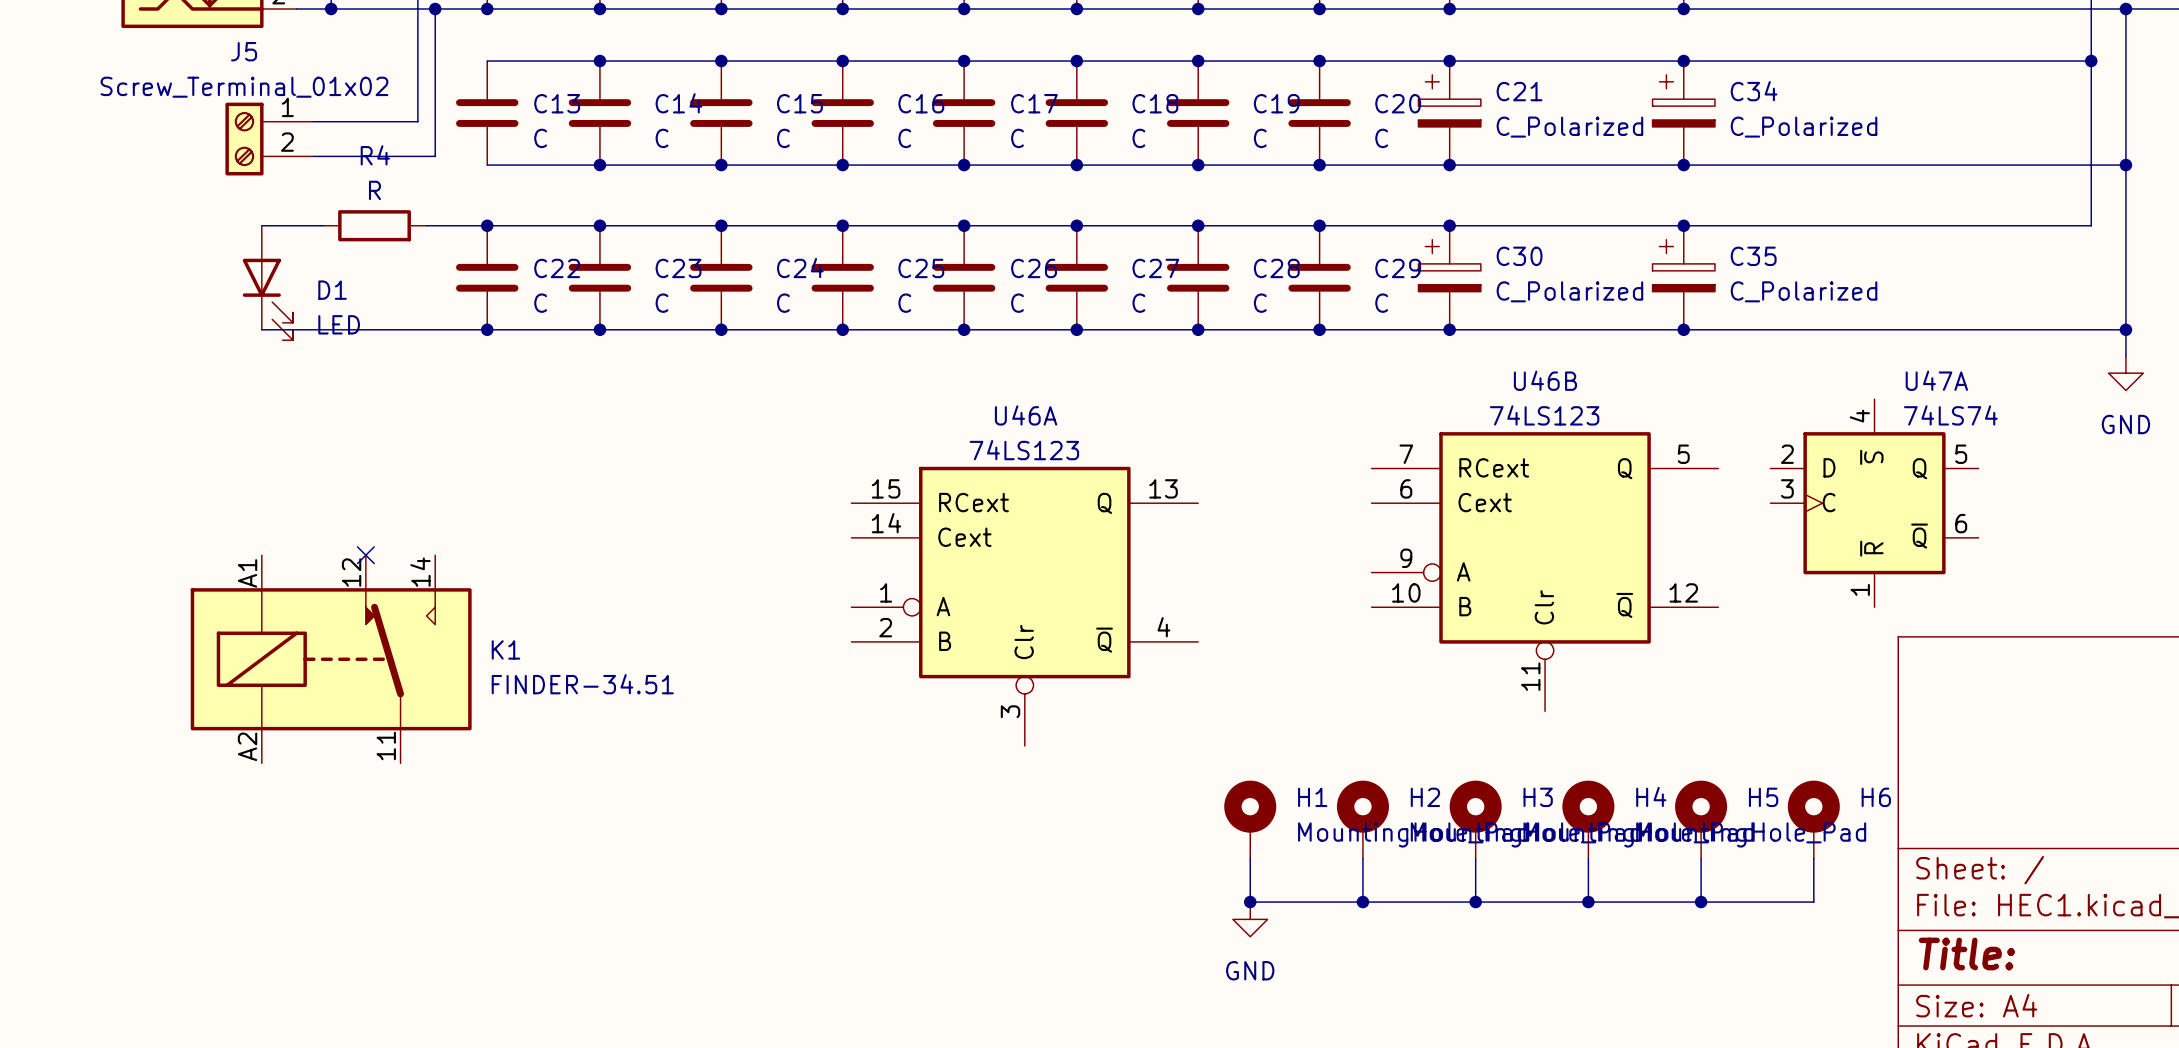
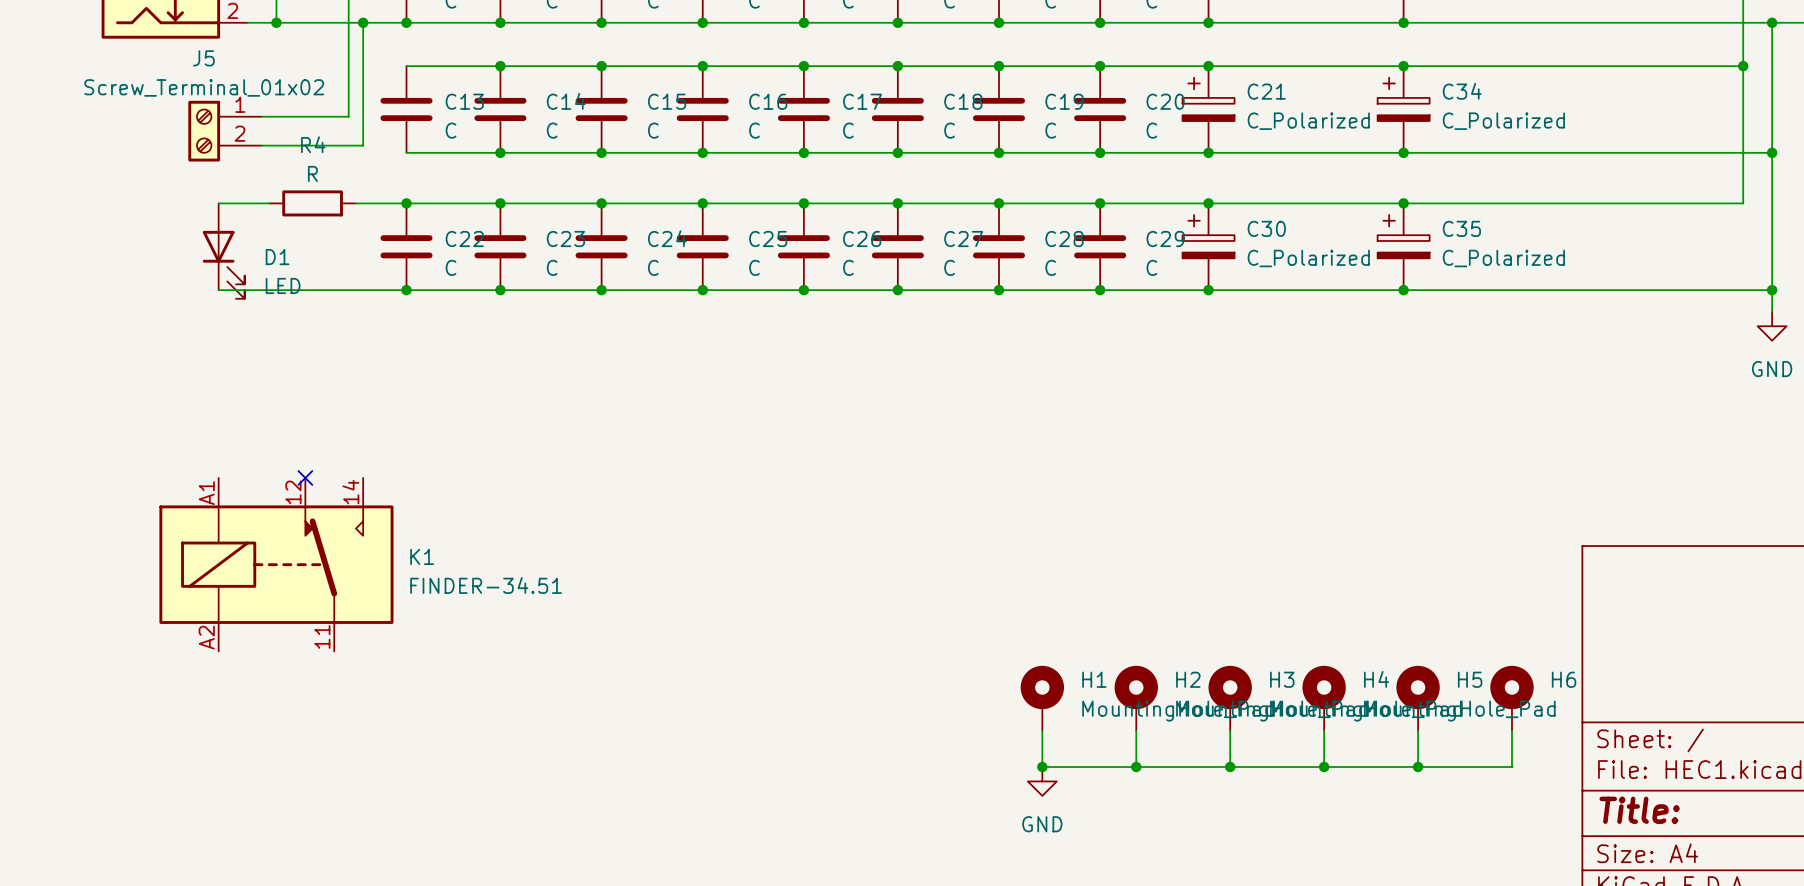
U47A: 74LS74 (1874, 503) -> none
U46B: 74LS123 (1545, 571) -> none
U46A: 74LS123 (1024, 606) -> none

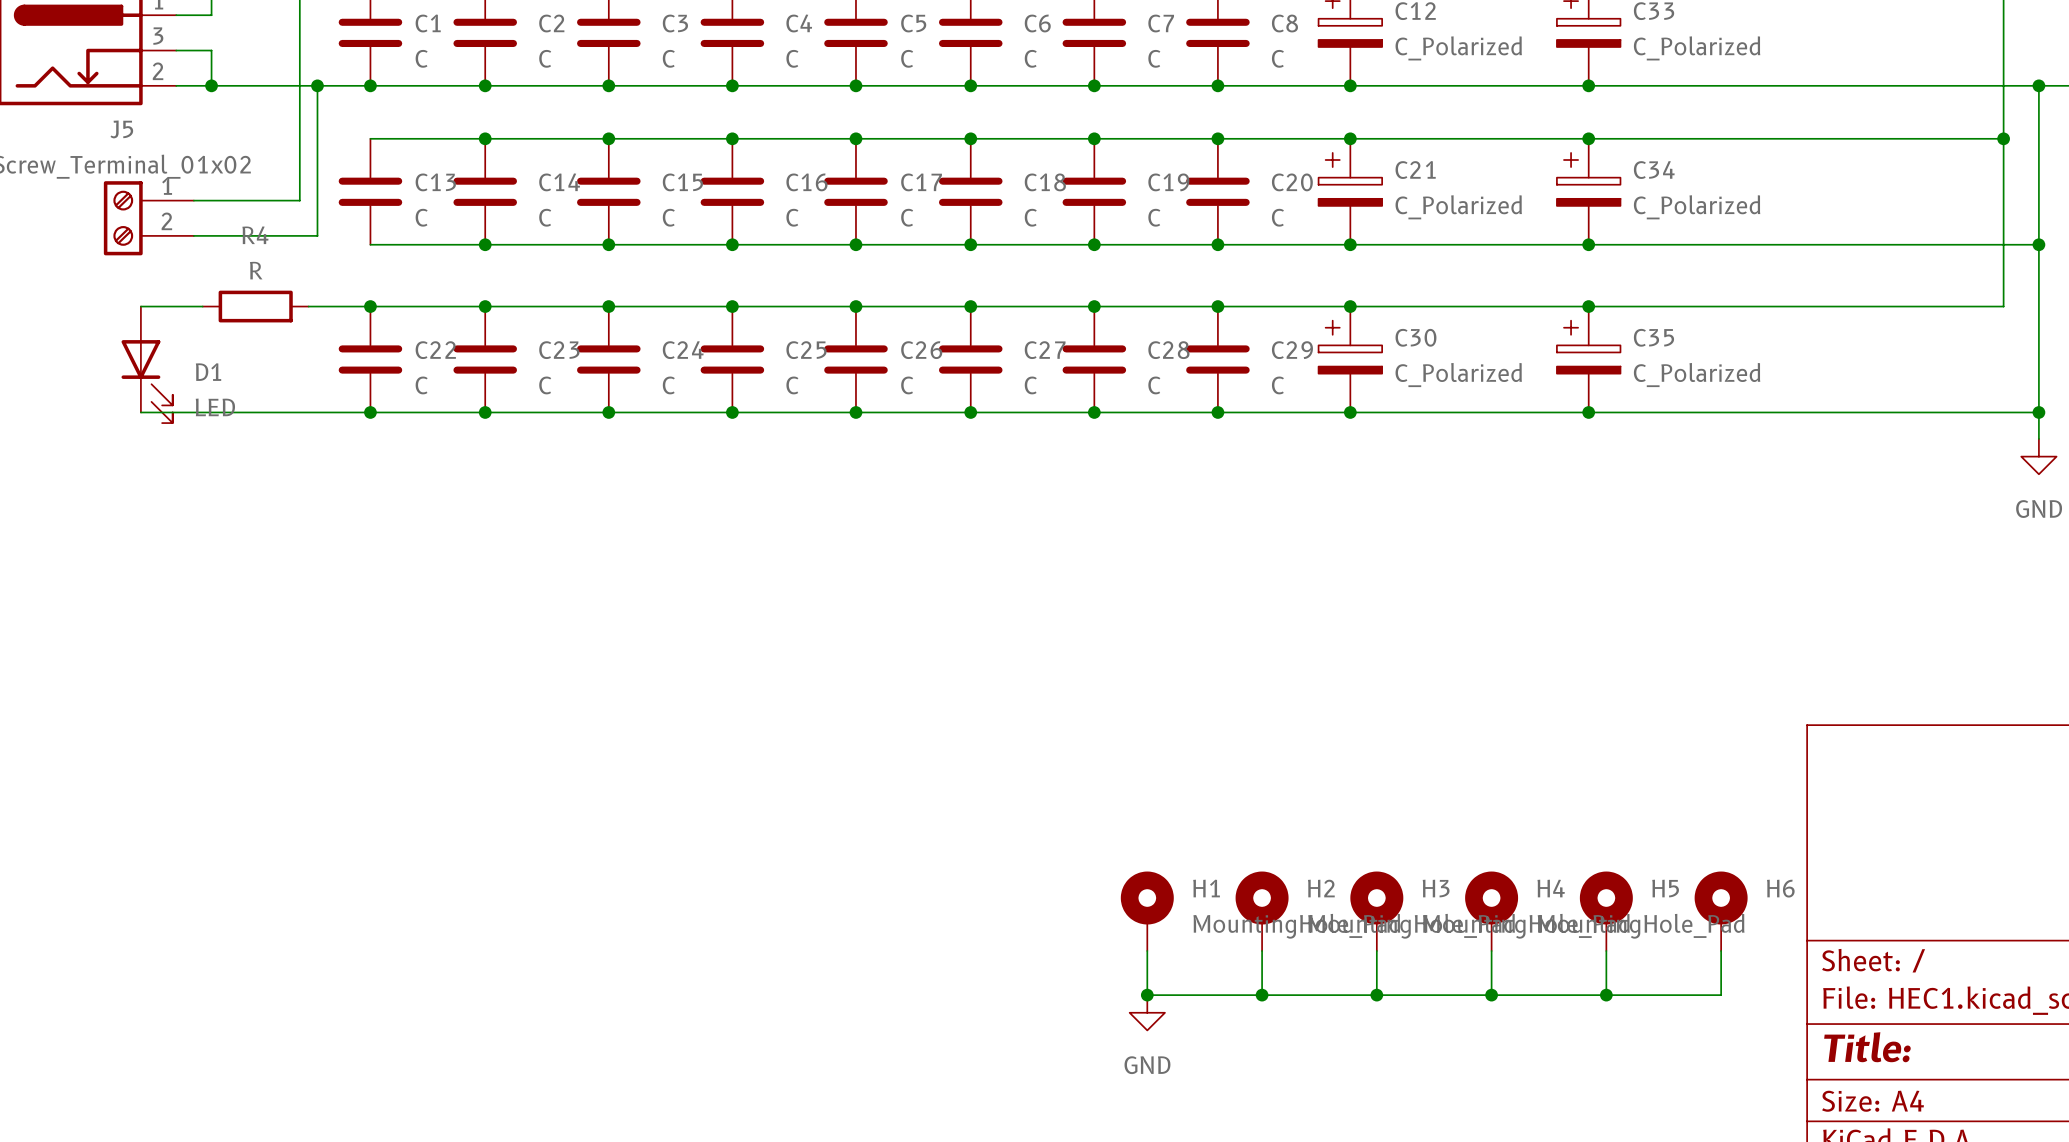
no-connect mark: (305, 477) -> none
K1: FINDER-34.51 (276, 564) -> none

